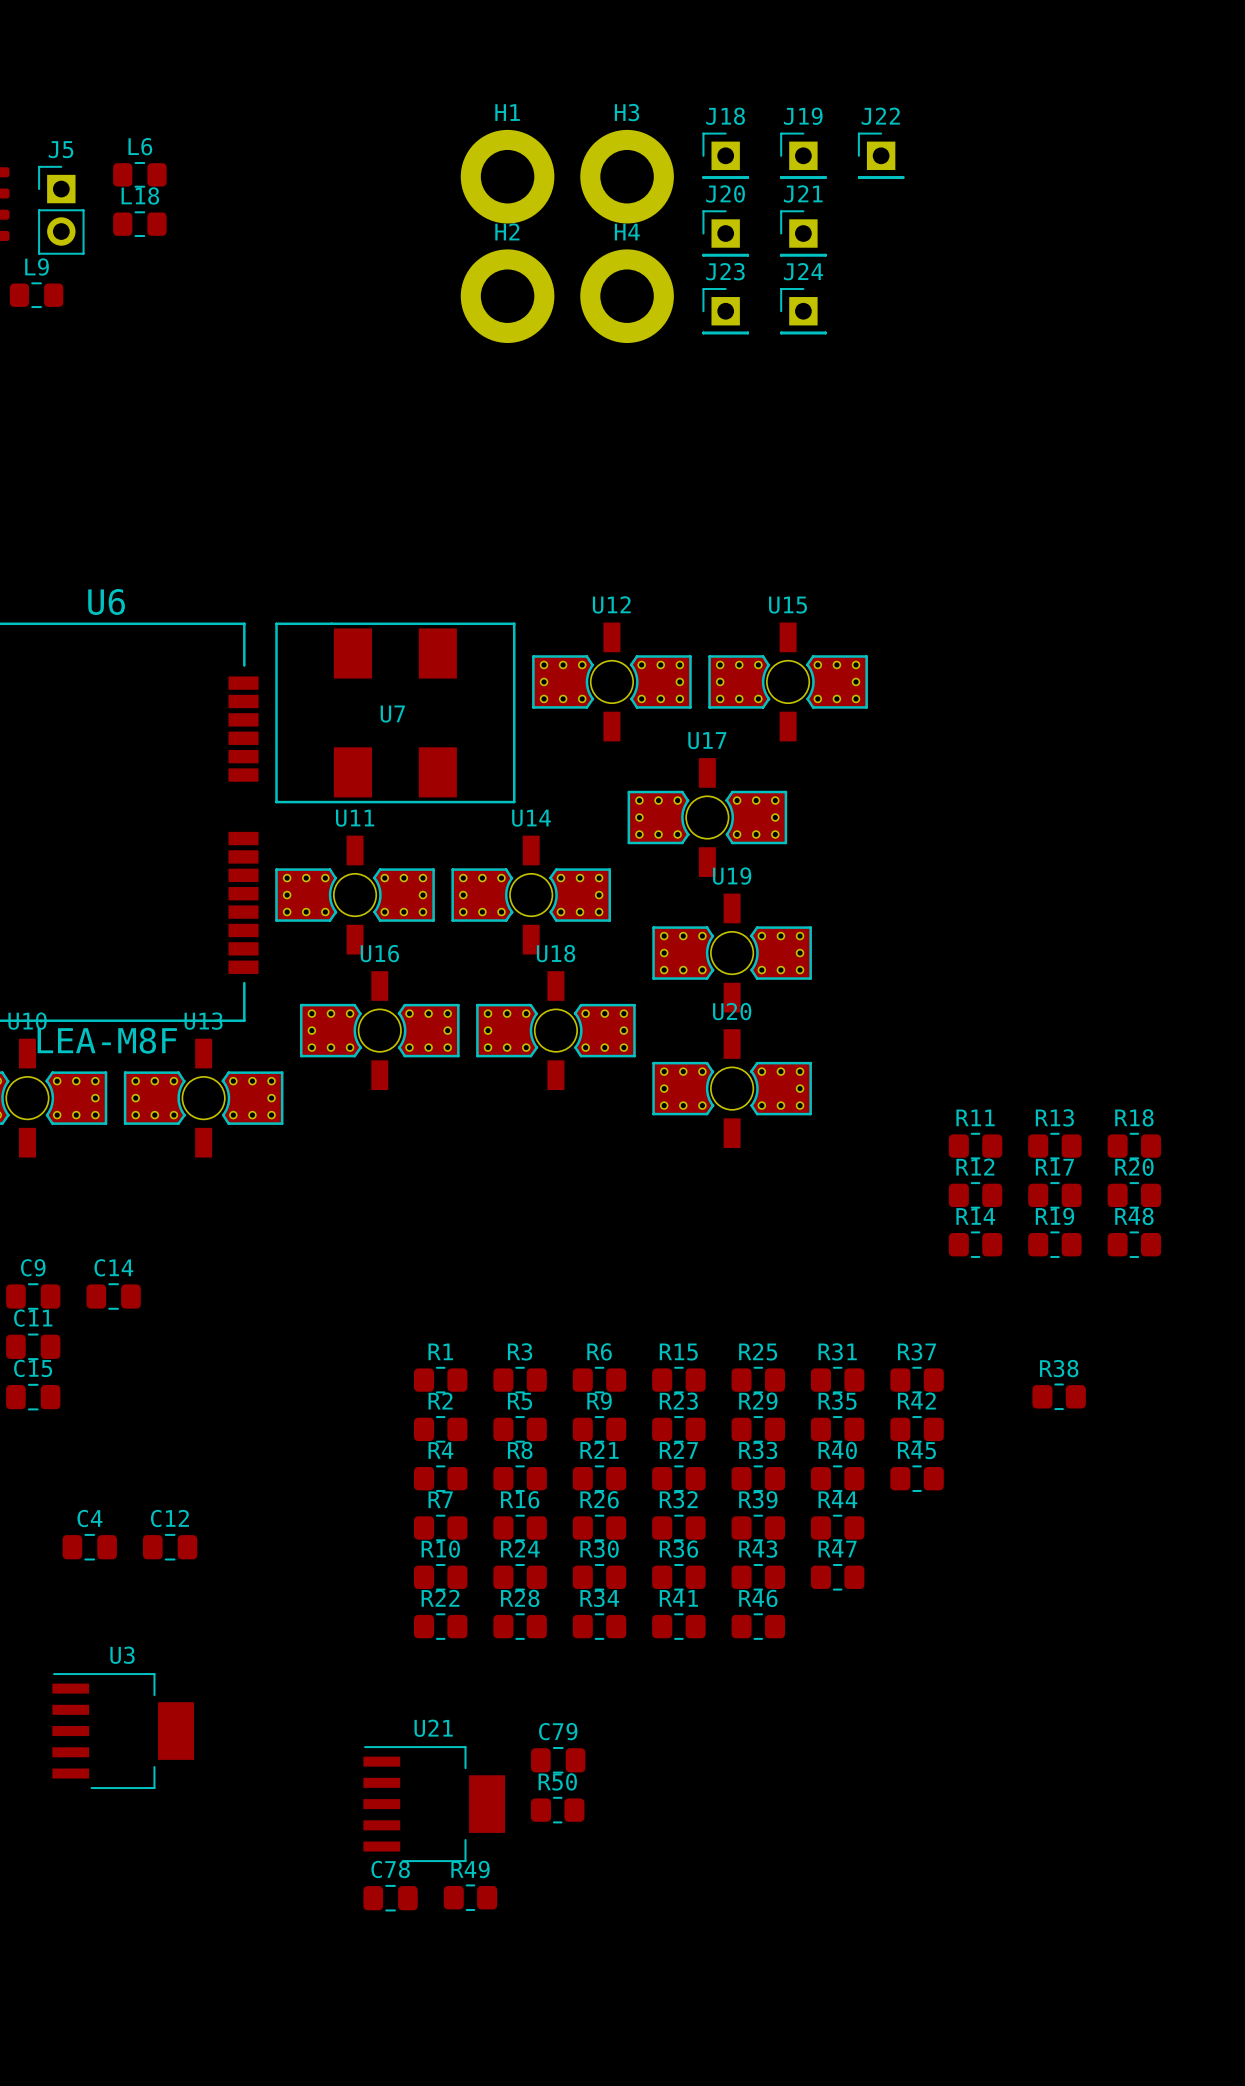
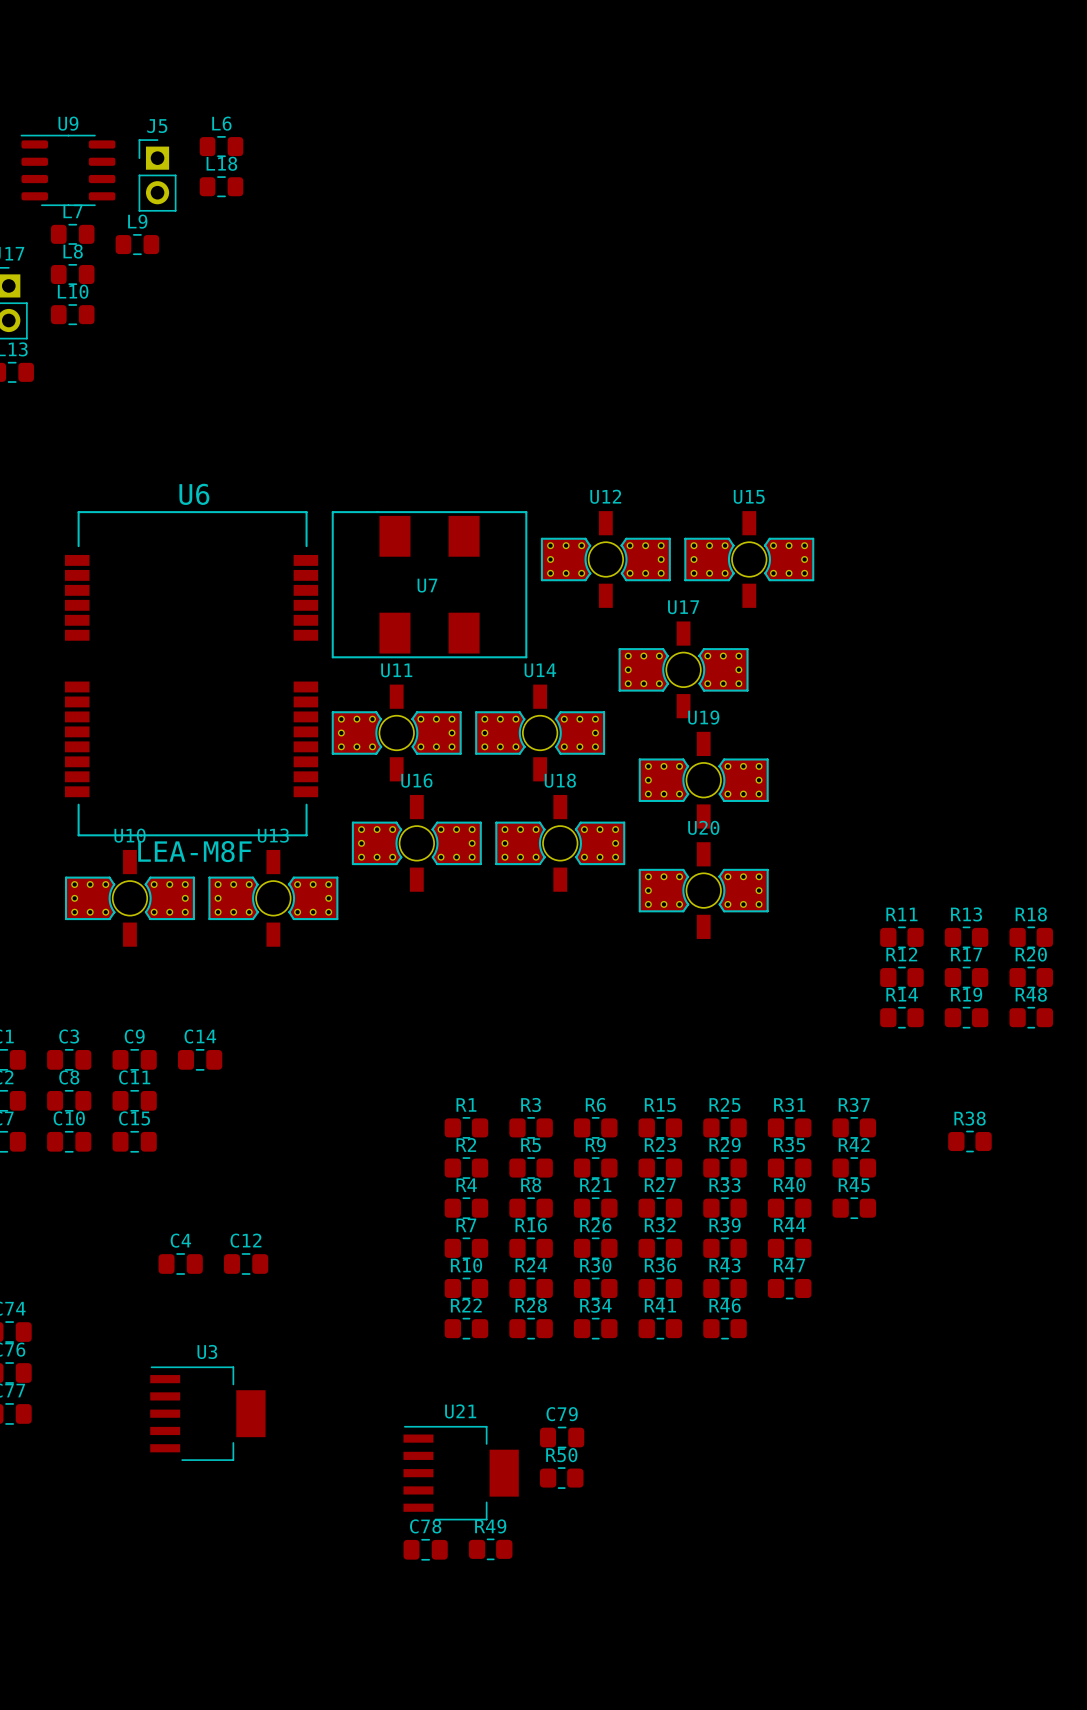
J18: (725, 155) -> none
J19: (803, 155) -> none
J22: (881, 155) -> none
H1: (507, 176) -> none
H3: (627, 176) -> none
J20: (725, 233) -> none
J21: (803, 233) -> none
H2: (507, 296) -> none
H4: (627, 296) -> none
J23: (725, 311) -> none
J24: (803, 311) -> none

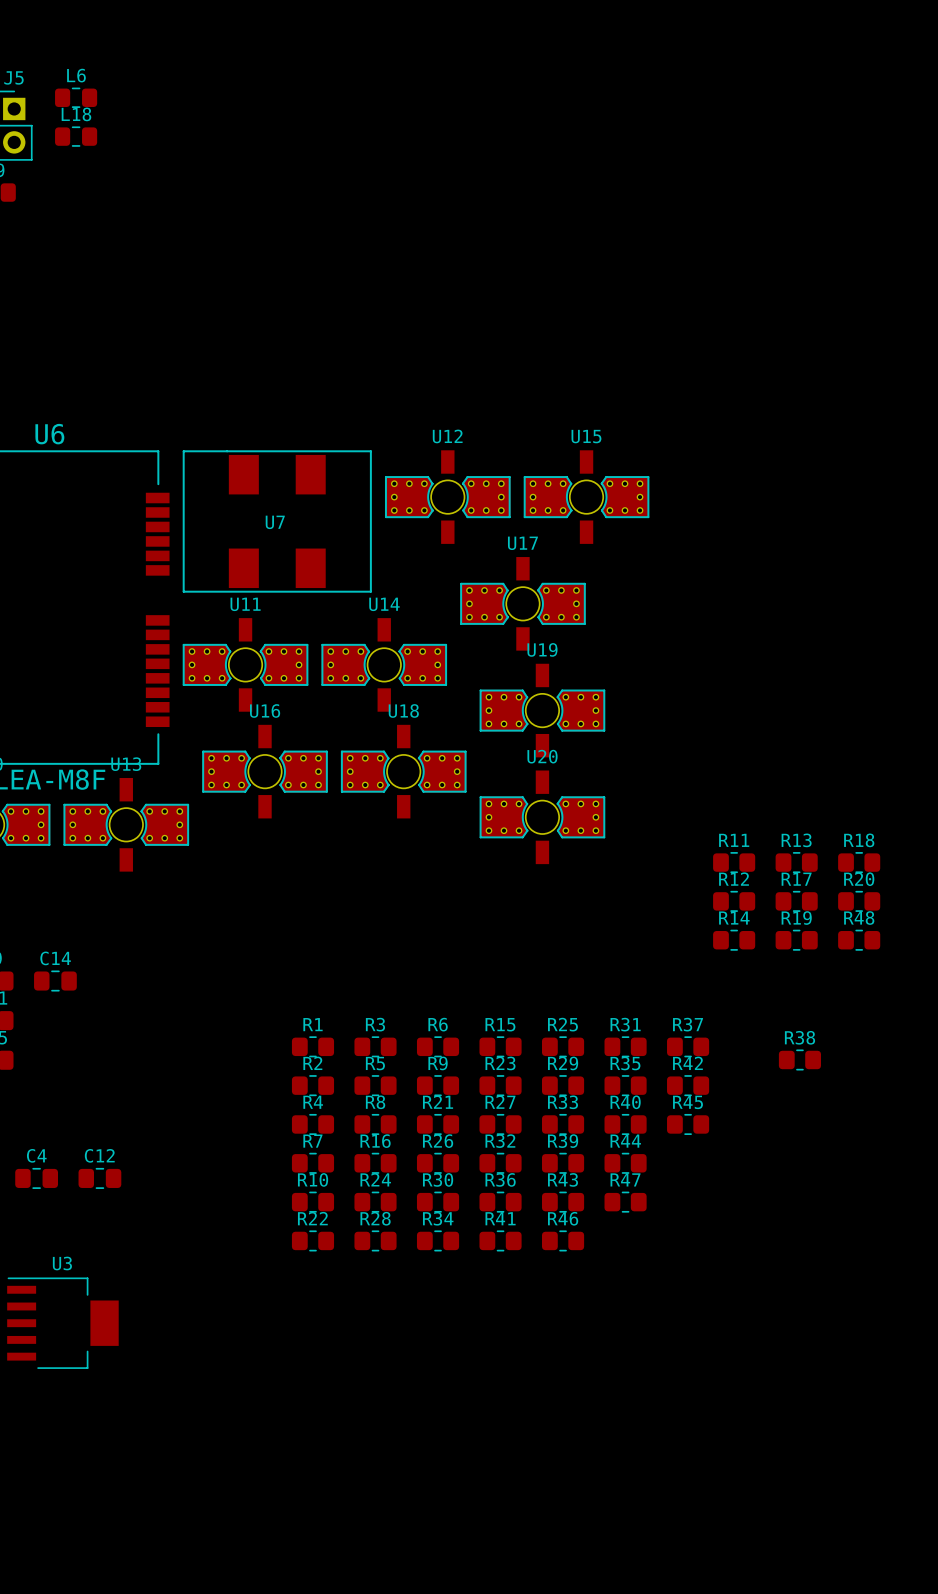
C79: (562, 1437) -> none
U21: (461, 1473) -> none
R50: (561, 1478) -> none
C78: (425, 1549) -> none
R49: (490, 1549) -> none

